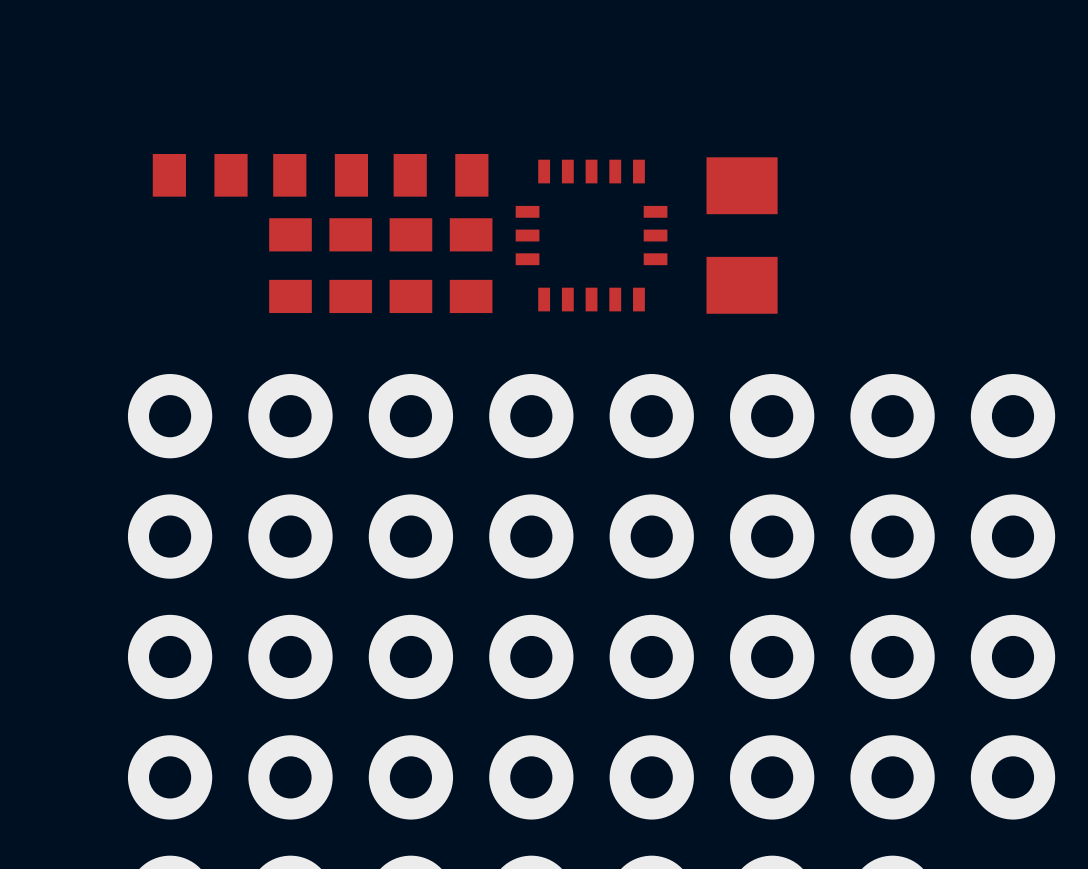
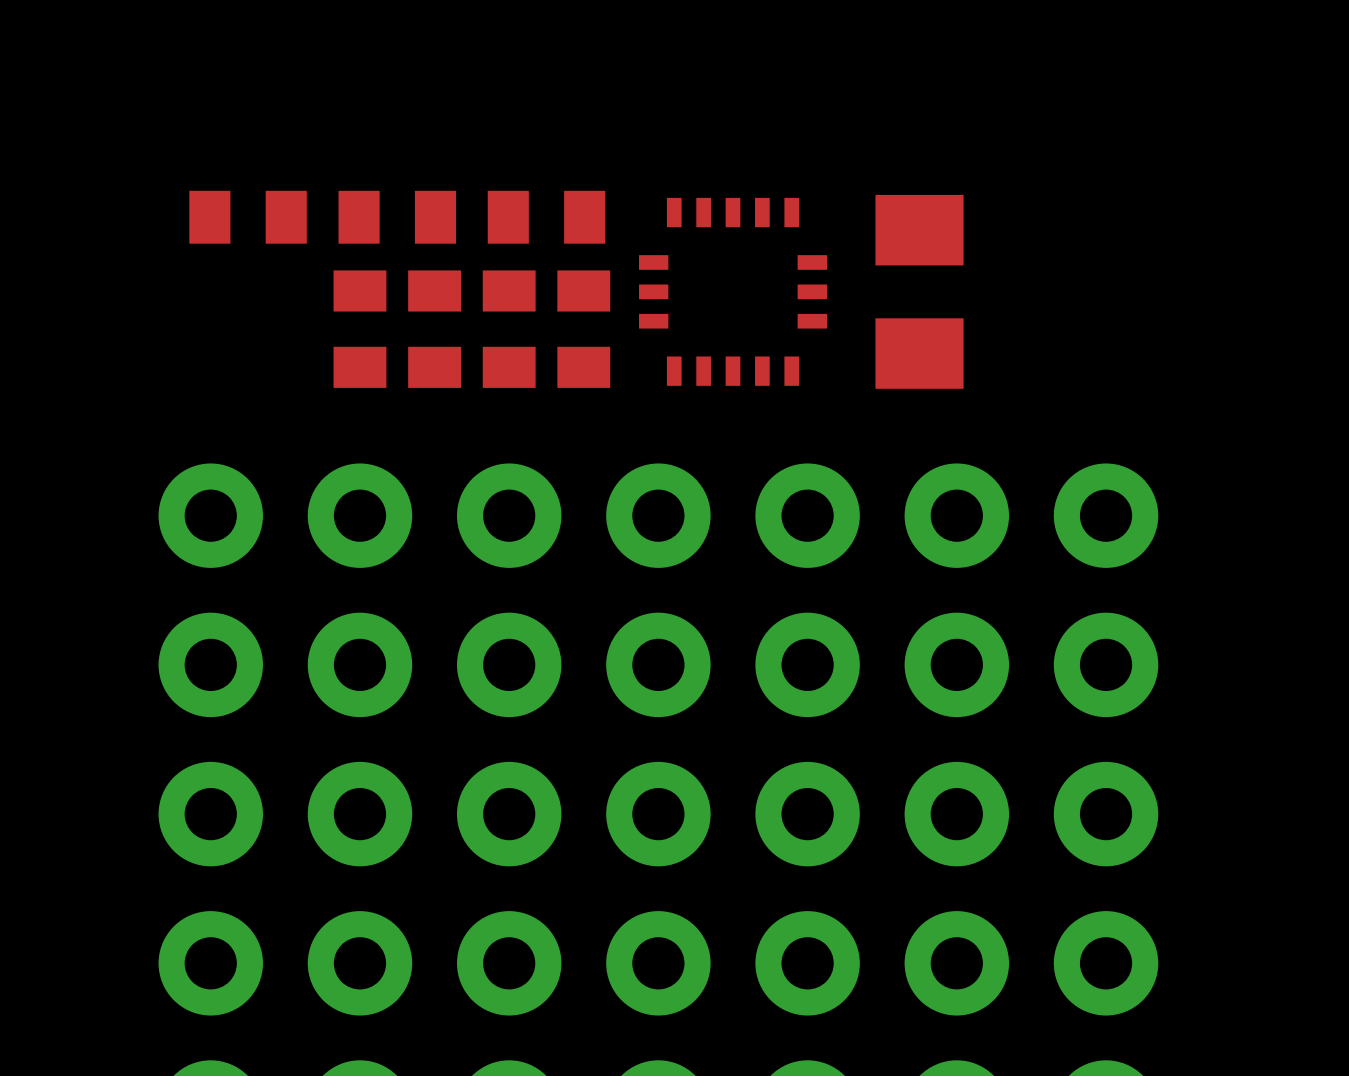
via: (1013, 416) -> none
via: (1013, 536) -> none
via: (1013, 656) -> none
via: (1013, 777) -> none

